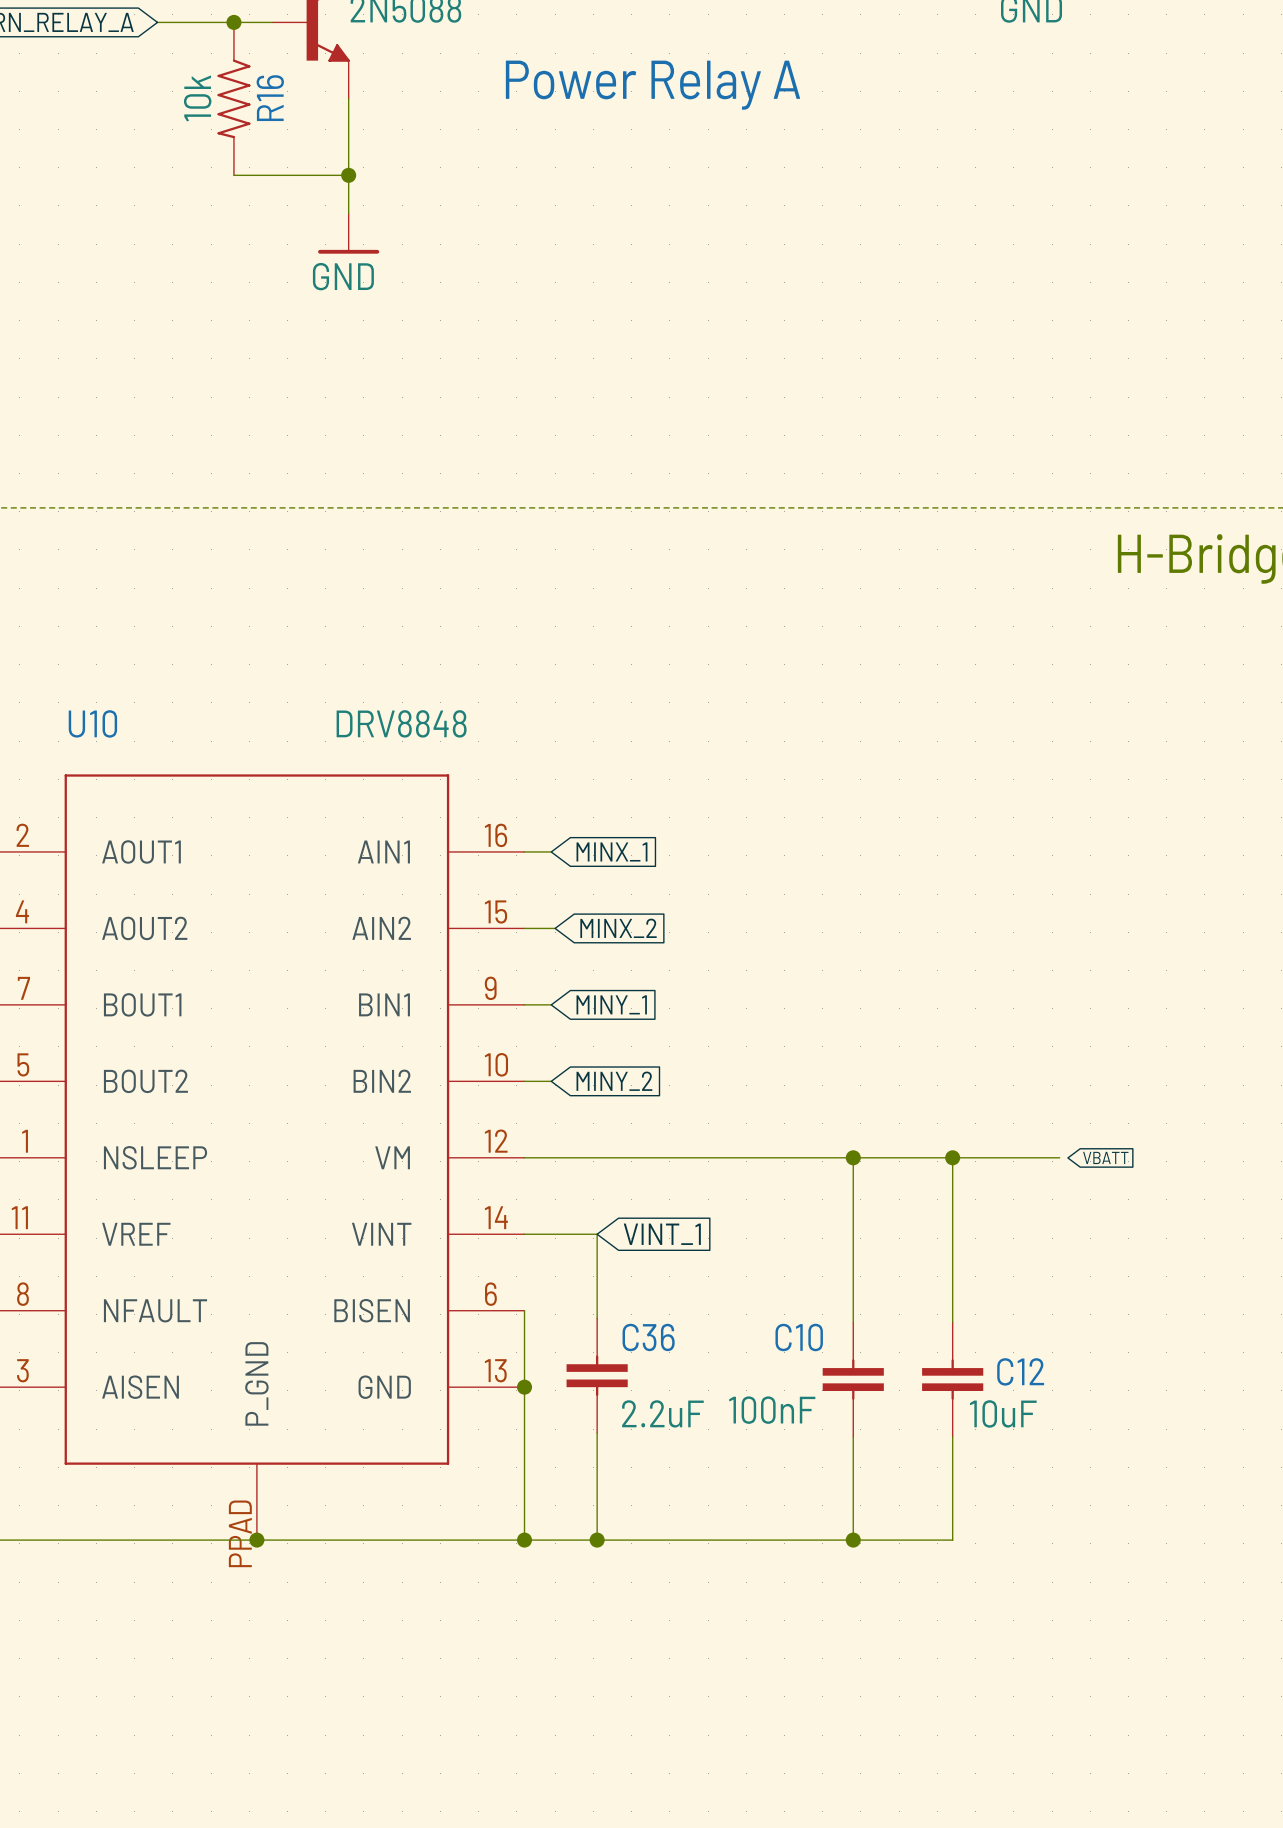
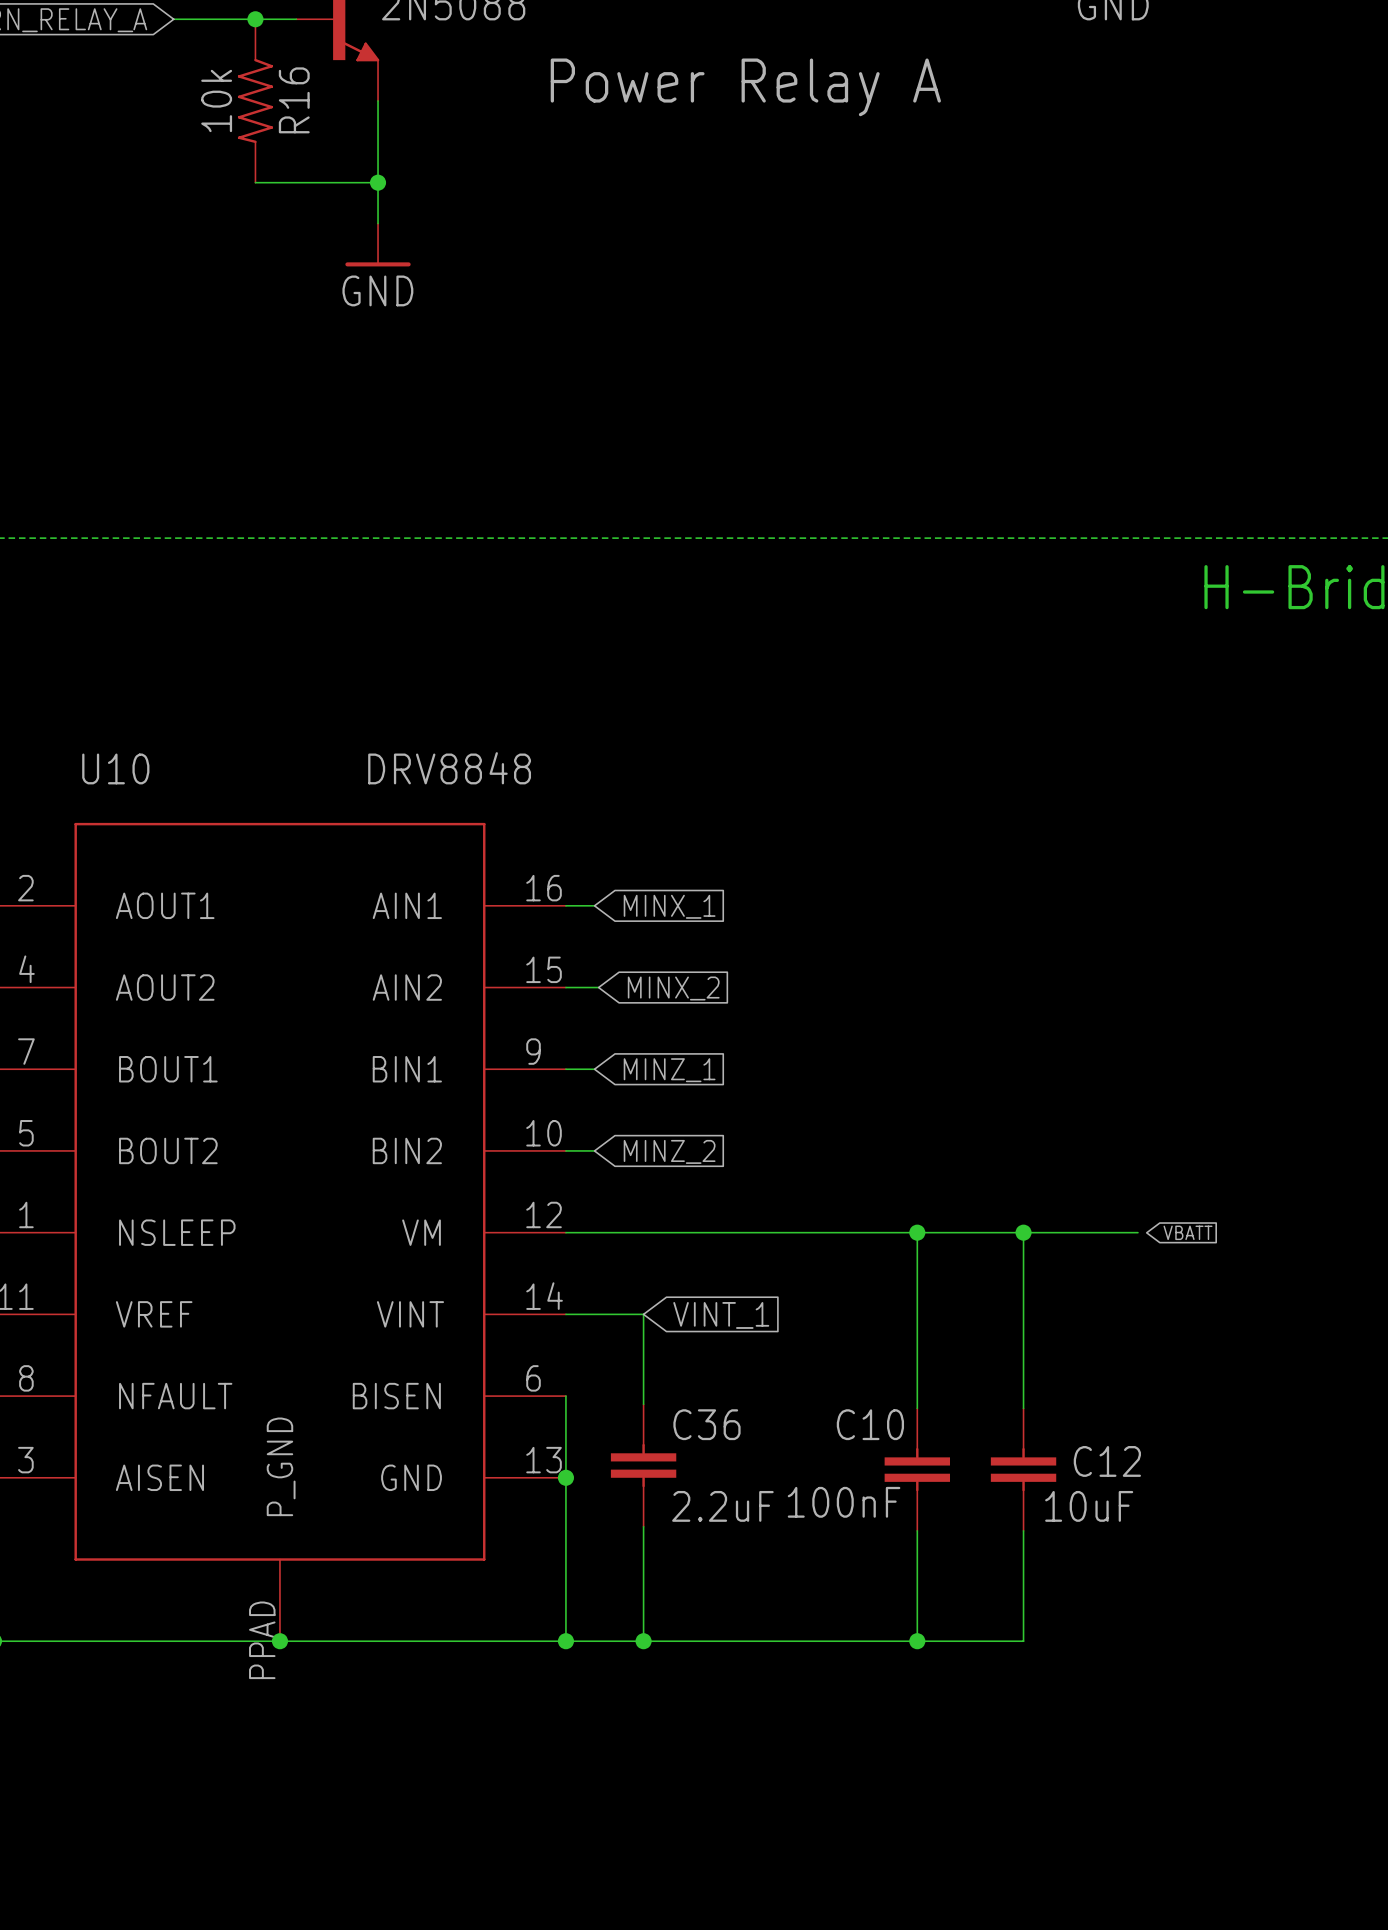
global label: MINY_1 (611, 1004) -> MINZ_1 (669, 1070)
global label: MINY_2 (614, 1081) -> MINZ_2 (669, 1151)

